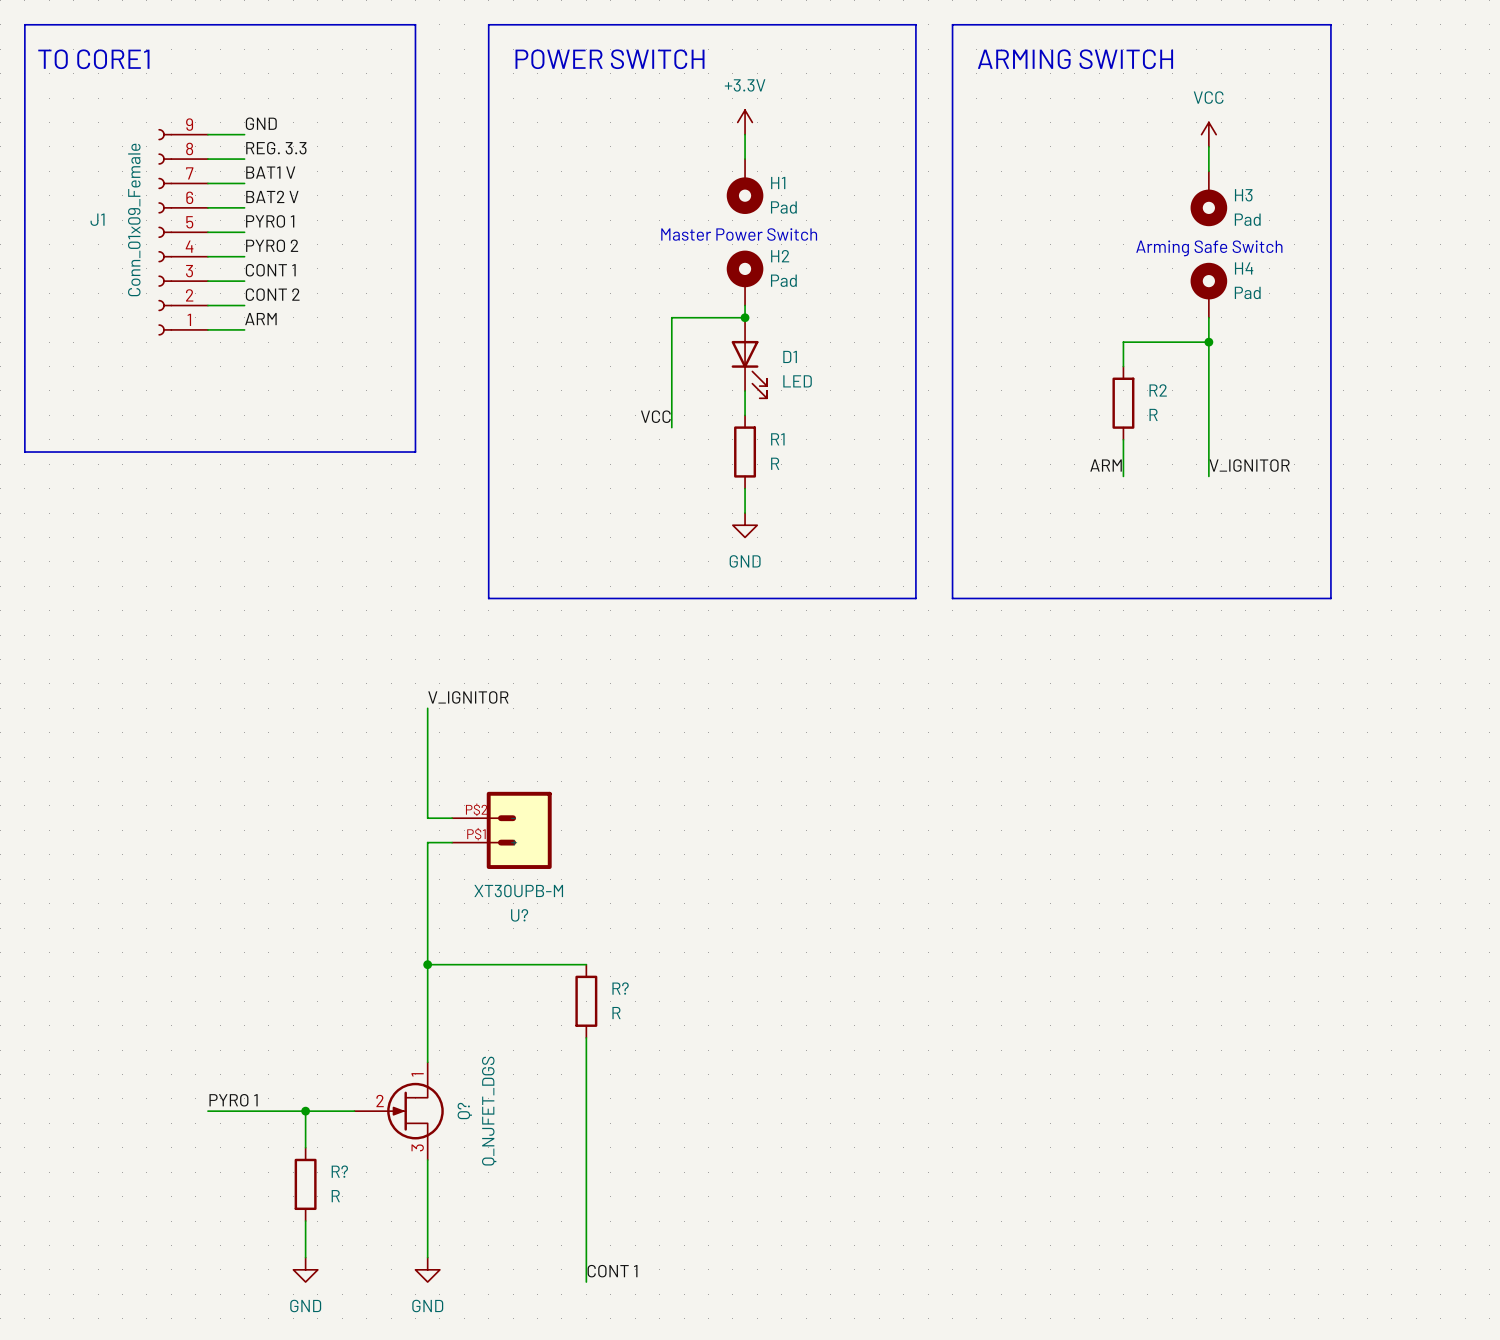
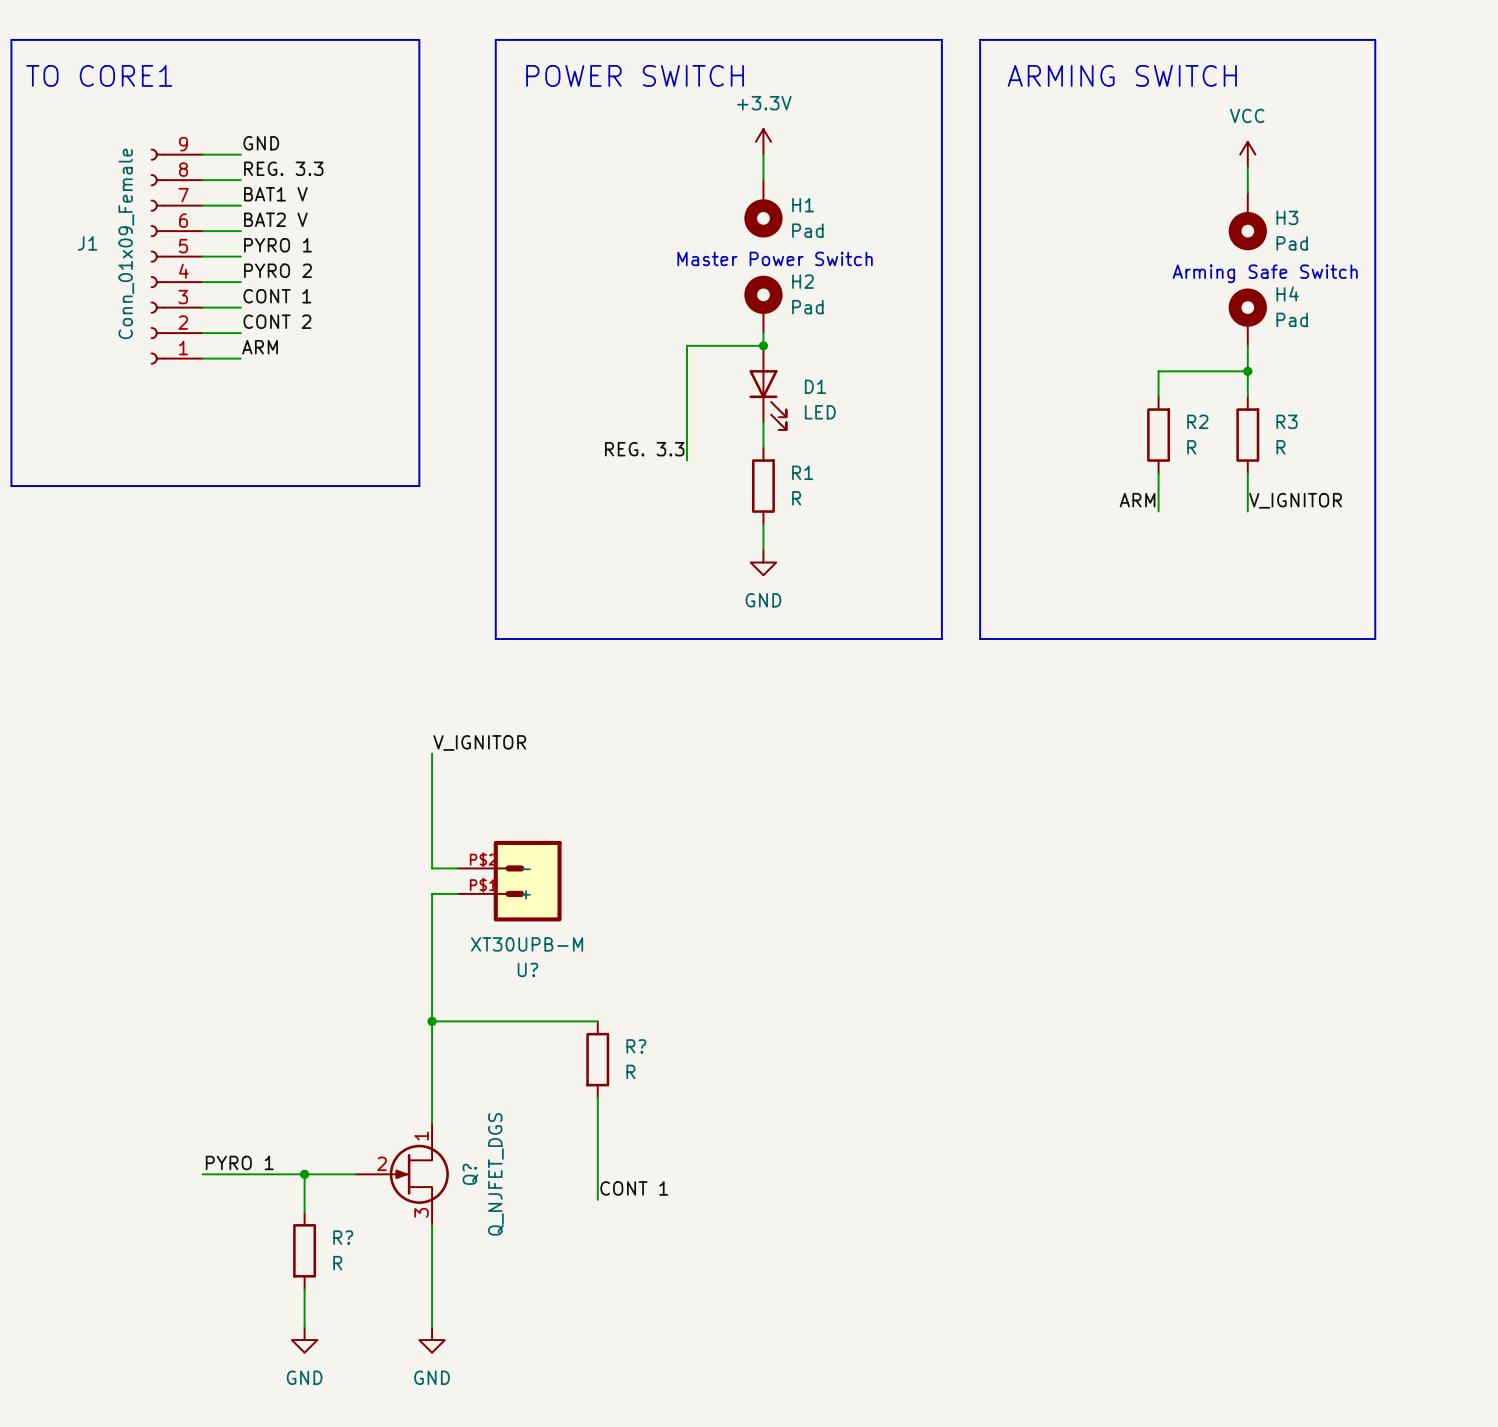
wire: (1208, 366) (1208, 439) -> none
R3: none -> R (1247, 435)
label: VCC (655, 416) -> REG. 3.3 (644, 449)
wire: (586, 1135) (586, 1282) -> none
label position: CONT 1 (612, 1271) -> CONT 1 (634, 1188)

